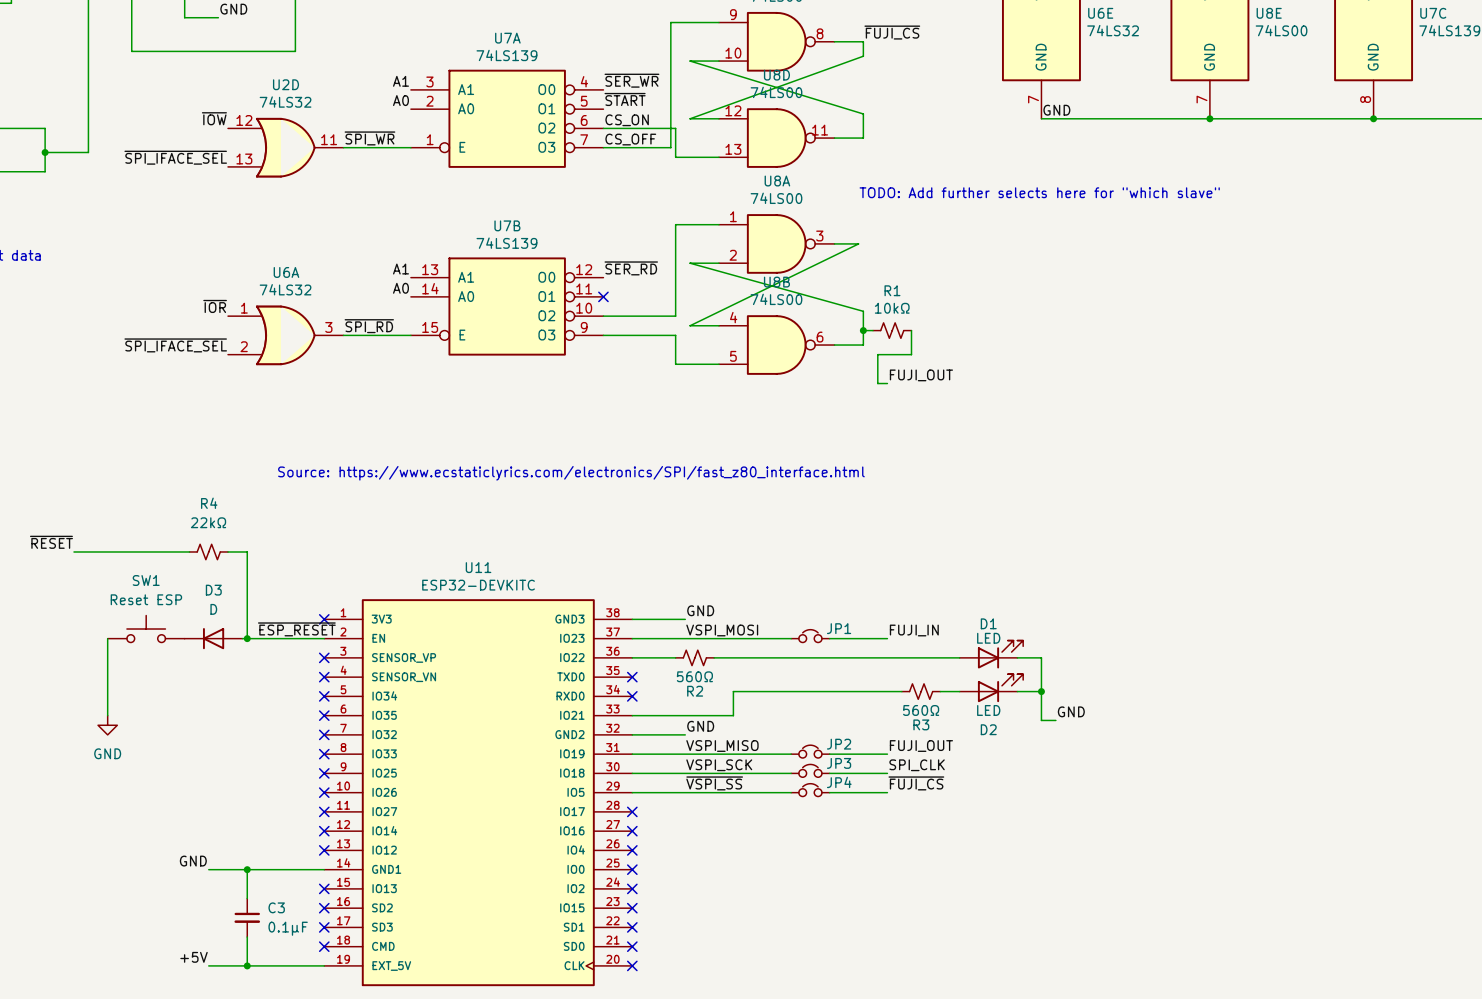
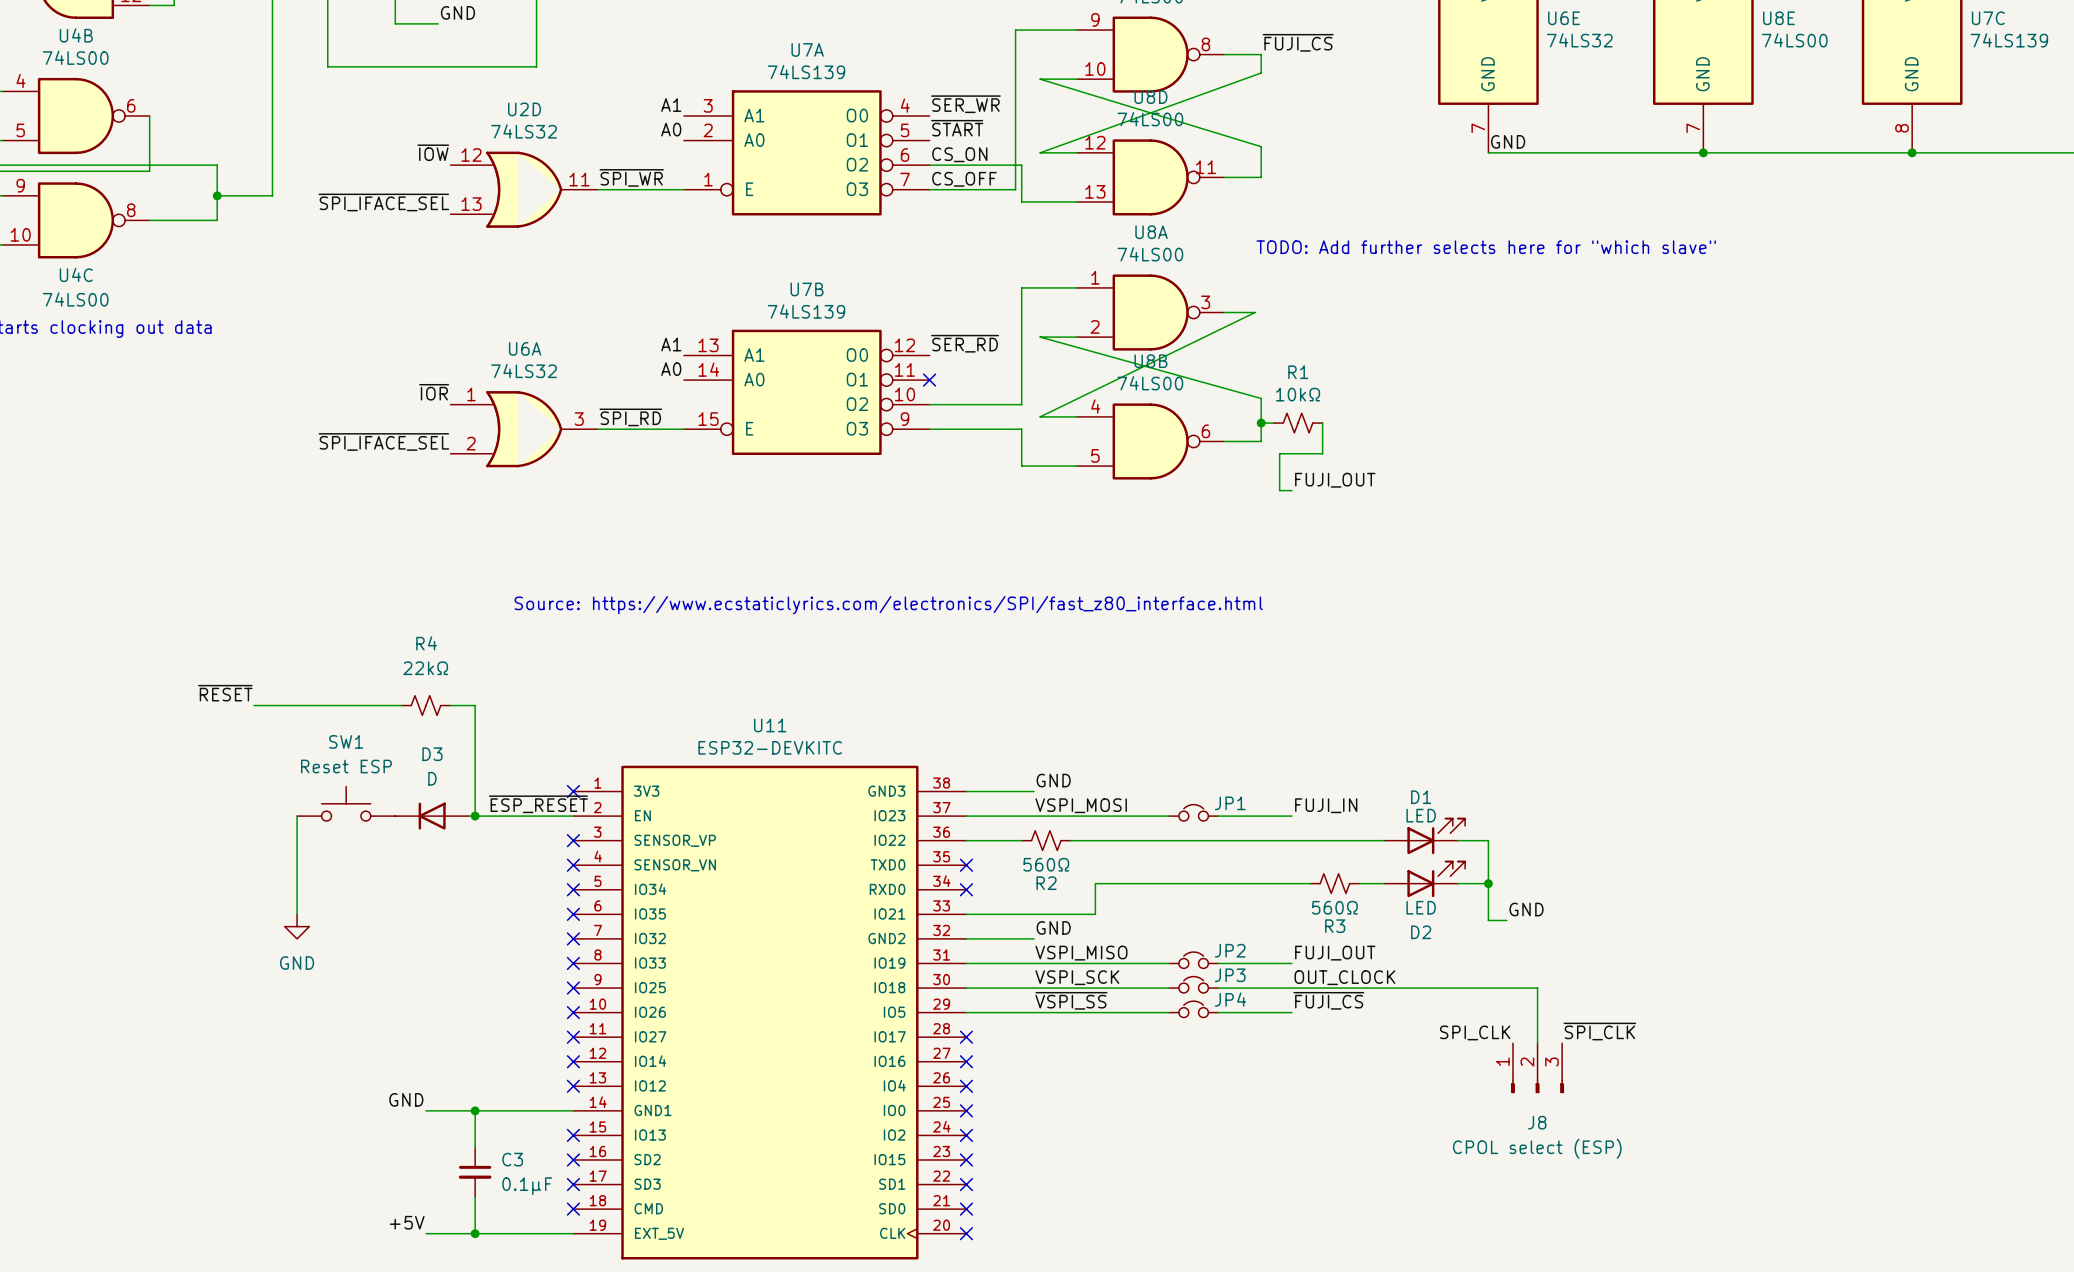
label: SPI_CLK (917, 765) -> OUT_CLOCK (1344, 977)
wire: none -> (1291, 988) (1537, 988) (1537, 1043)
label: none -> ~{SPI_CLK} (1599, 1031)
label: none -> SPI_CLK (1475, 1032)
J8: none -> CPOL select (ESP) (1537, 1068)

